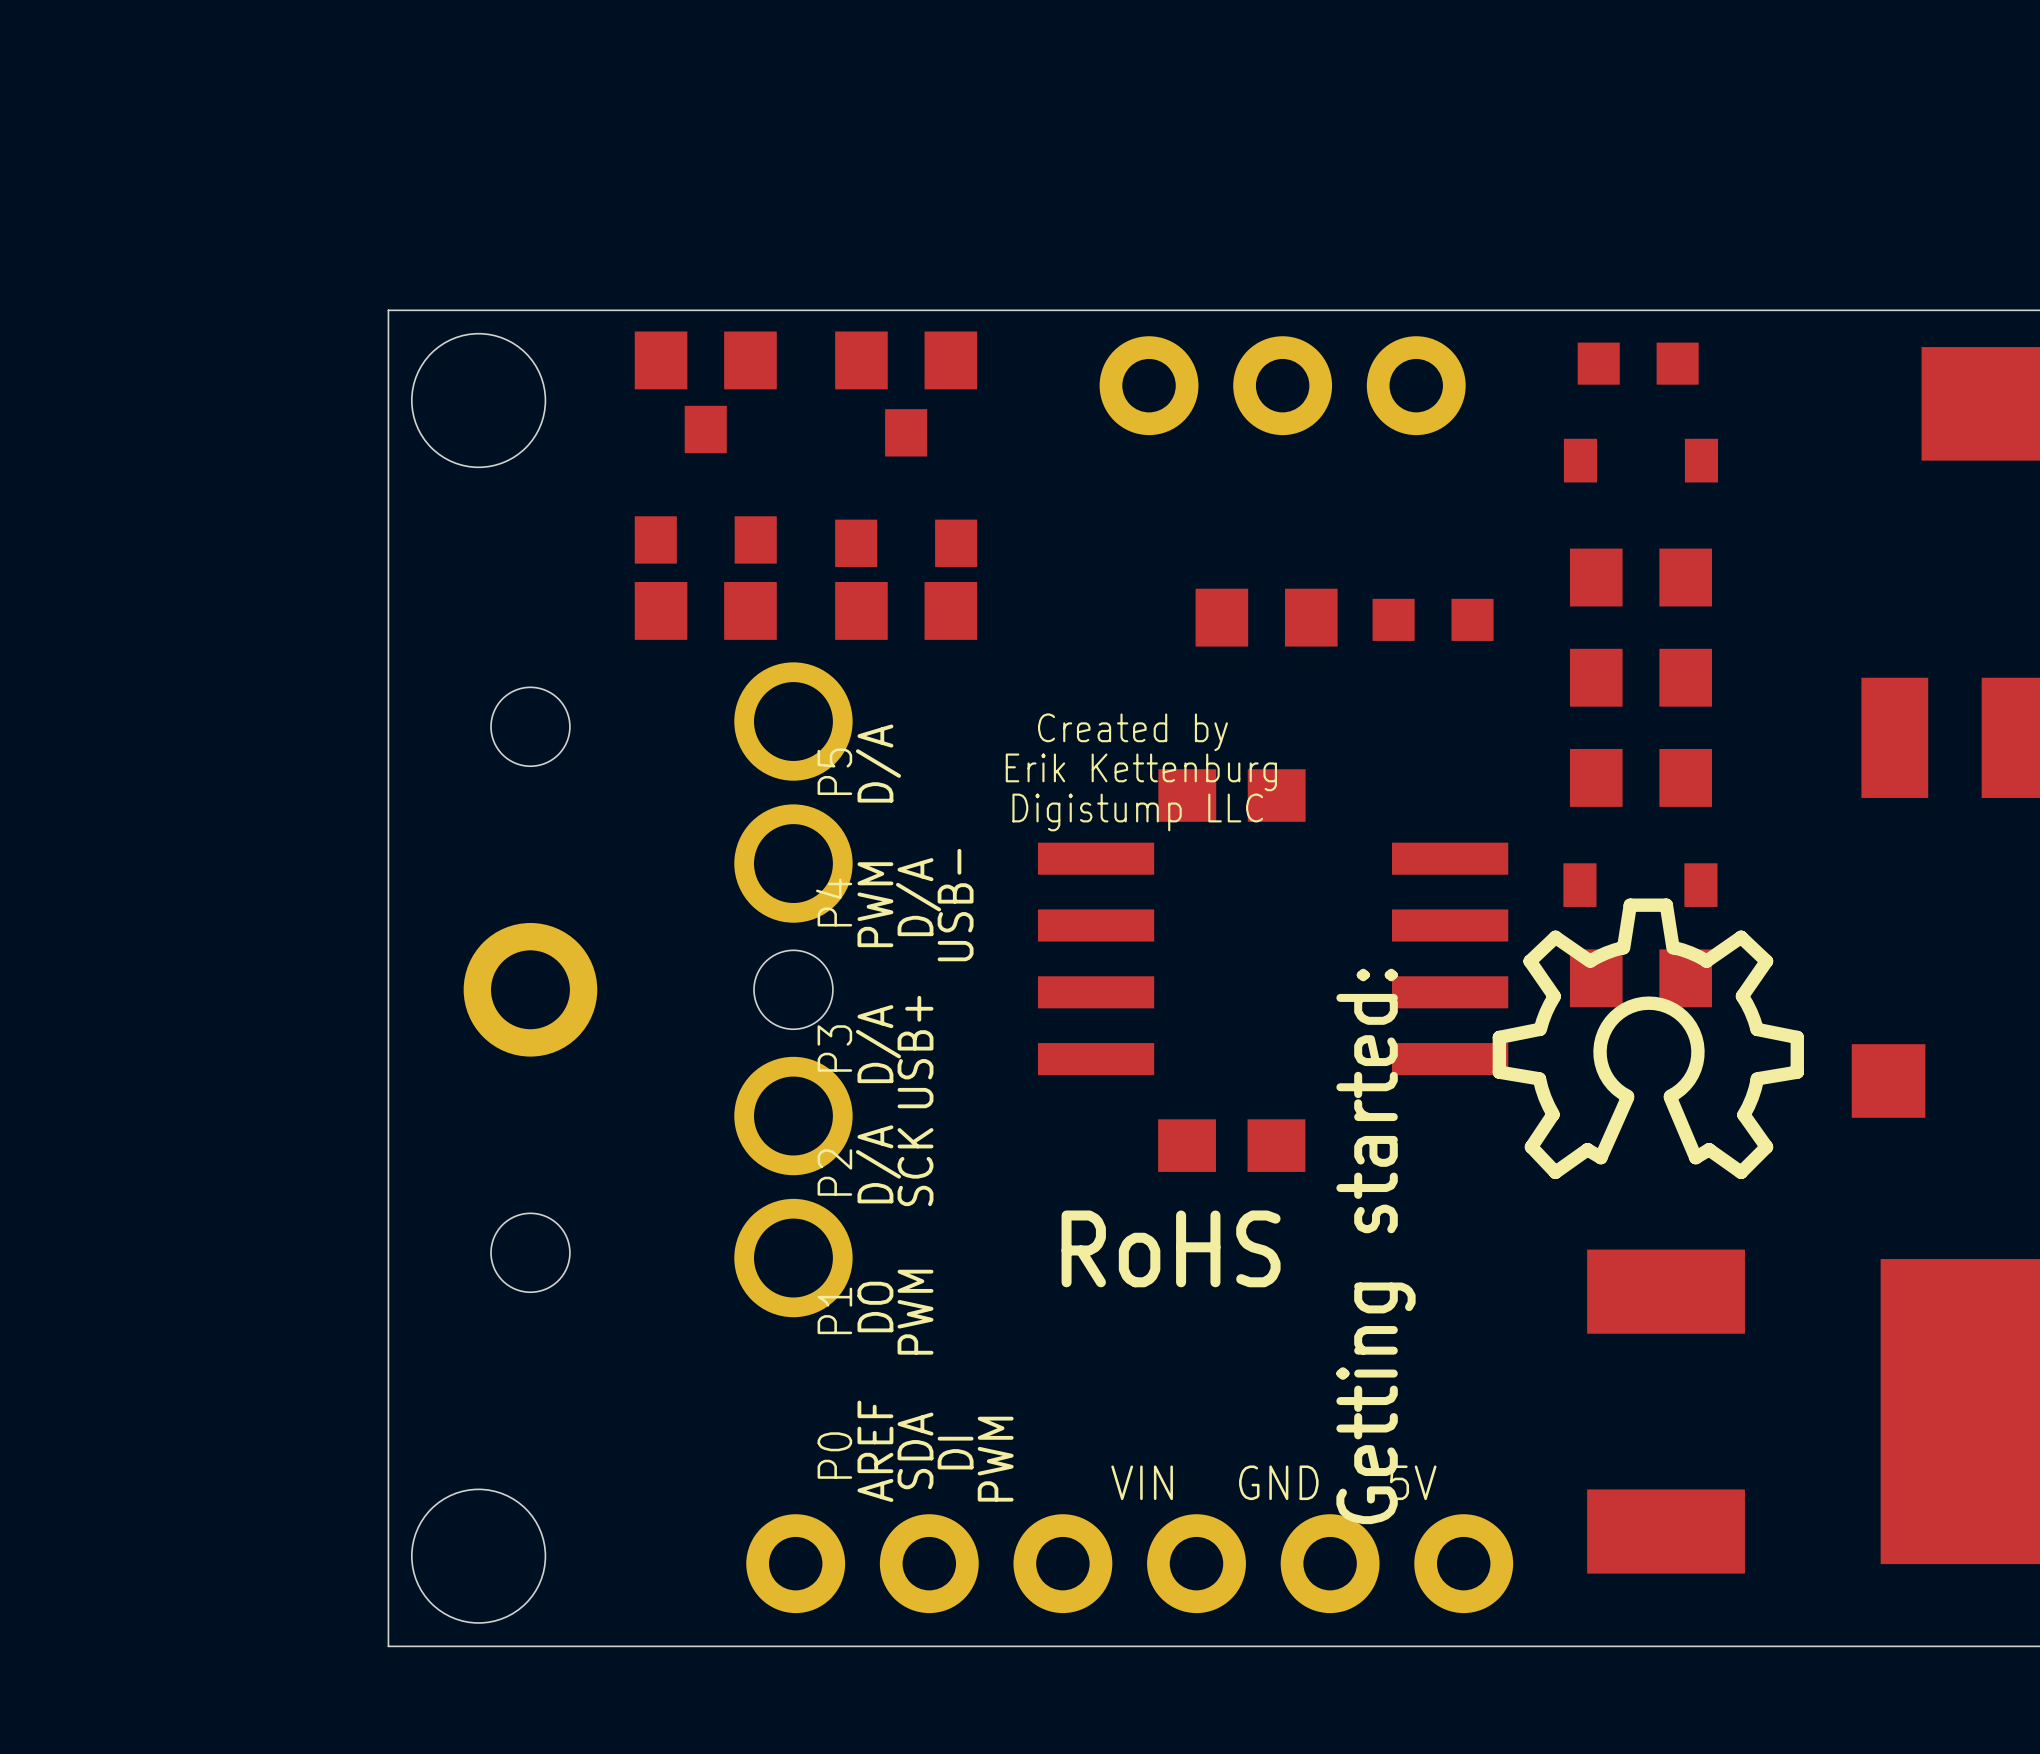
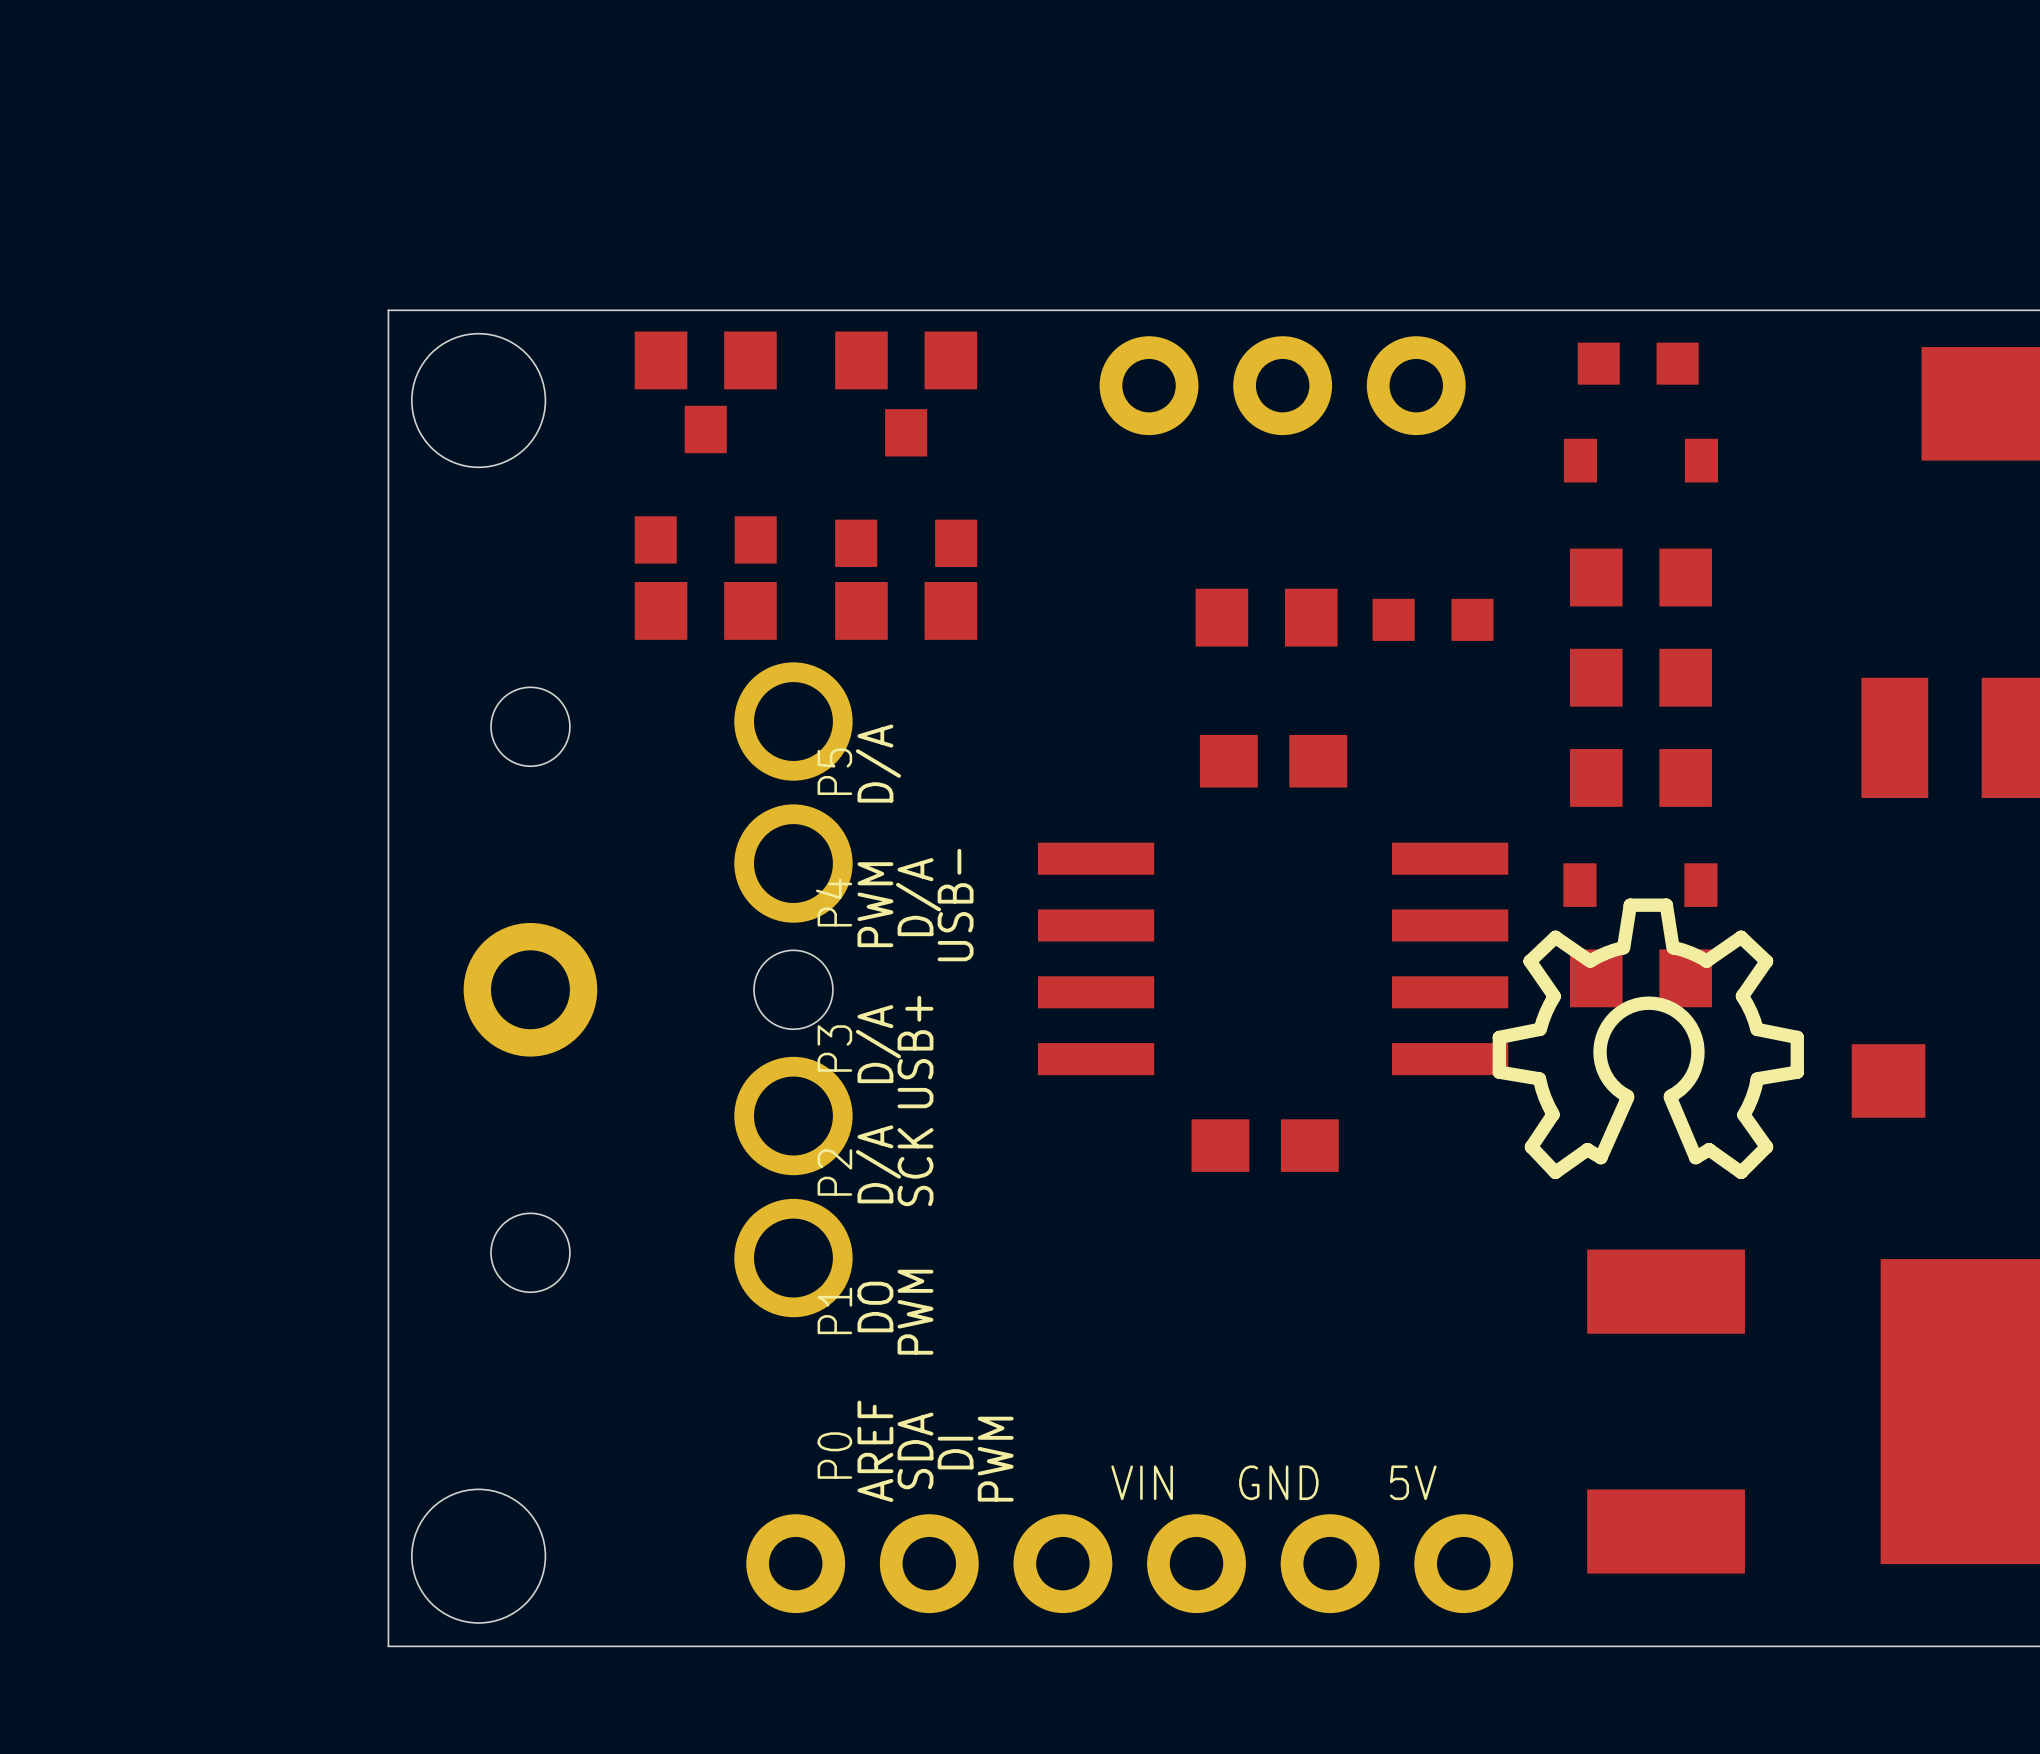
text: Created by (1132, 732) -> none
text: Erik Kettenburg (1141, 772) -> none
part position: (1231, 795) -> (1273, 761)
text: Digistump LLC (1137, 812) -> none
part position: (1231, 1145) -> (1265, 1145)
text: Getting started: (1375, 1246) -> none
text: RoHS (1171, 1248) -> none

